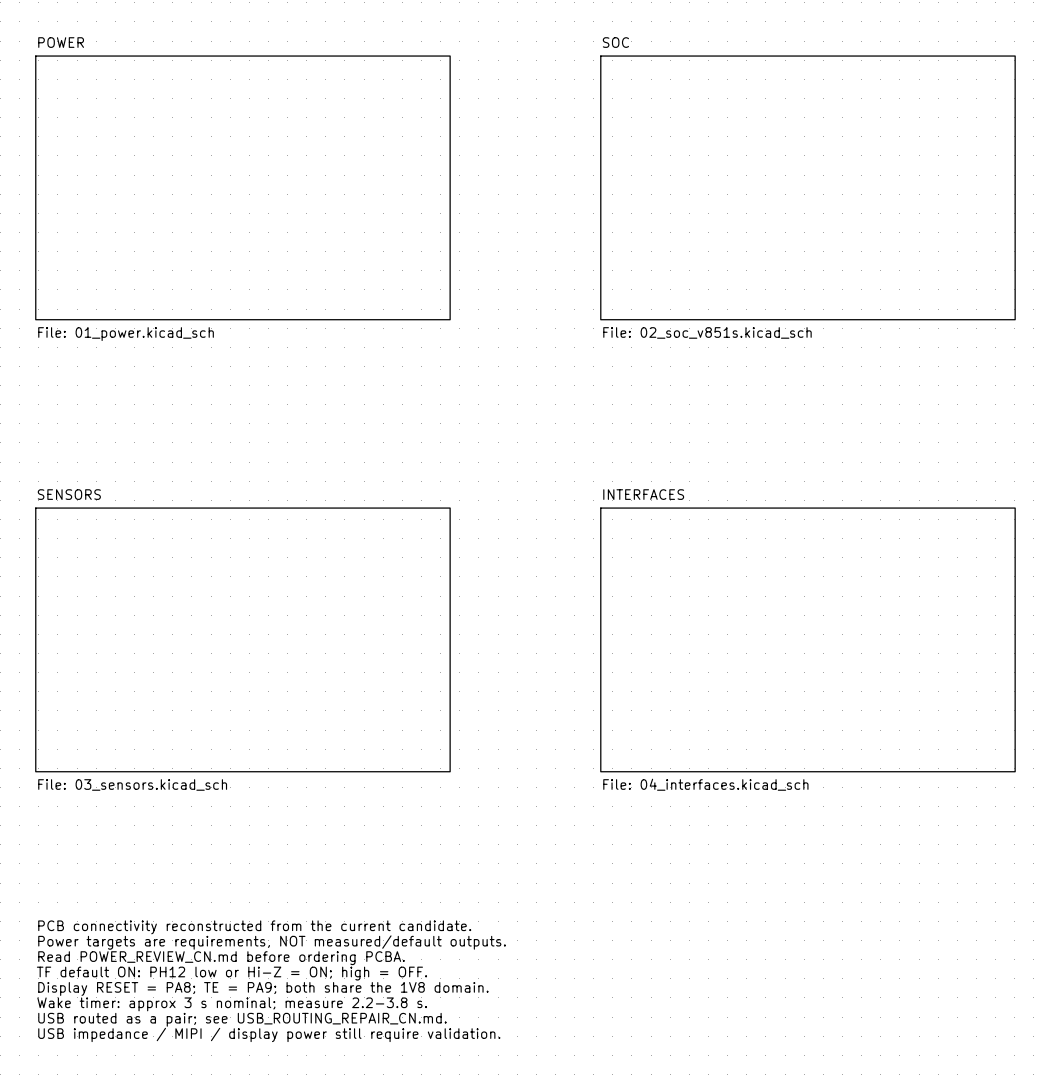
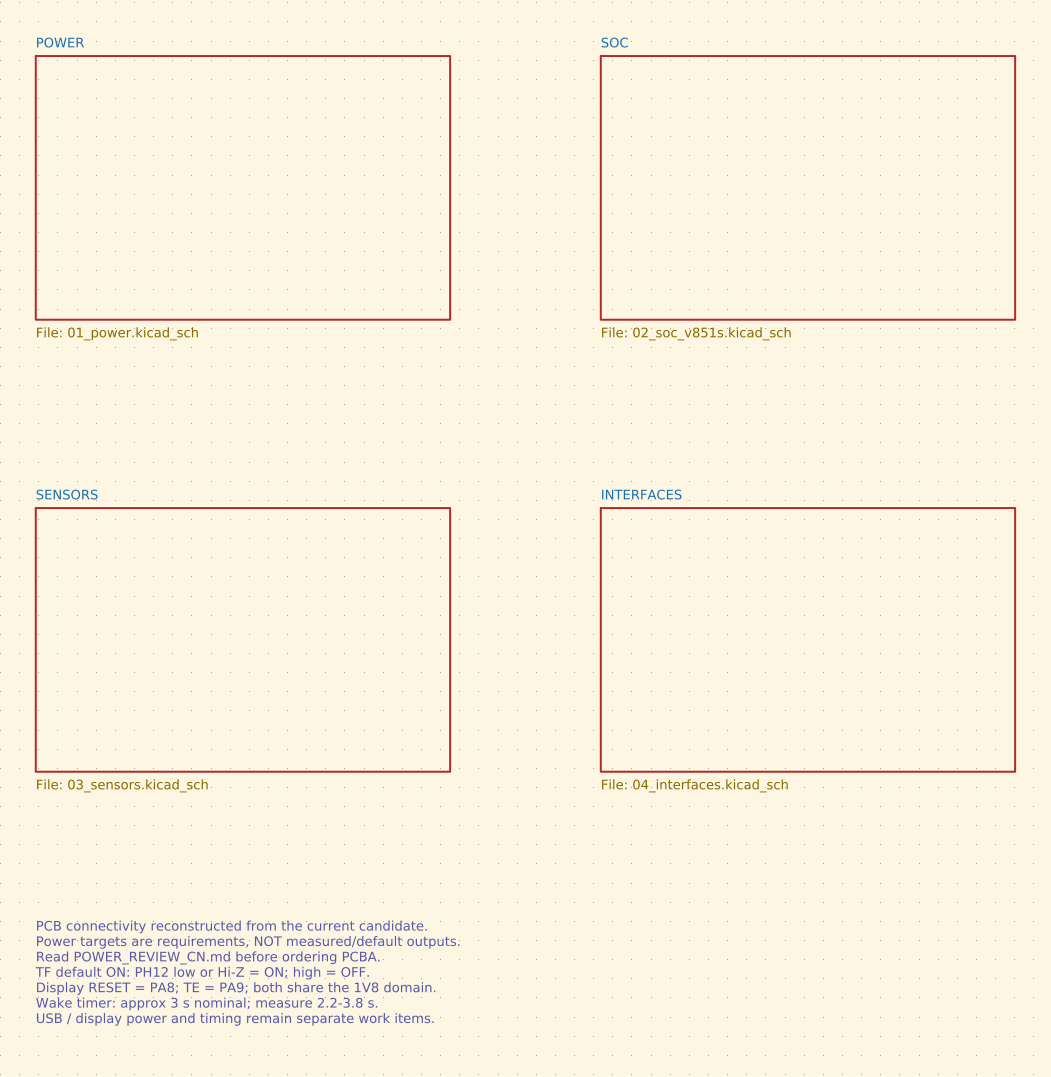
text: USB routed as a pair; see USB_ROUTING_REPAIR_CN.md. (242, 1019) -> USB / display power and timing remain separate work items. (235, 1019)
text: USB impedance / MIPI / display power still require validation. (269, 1034) -> none

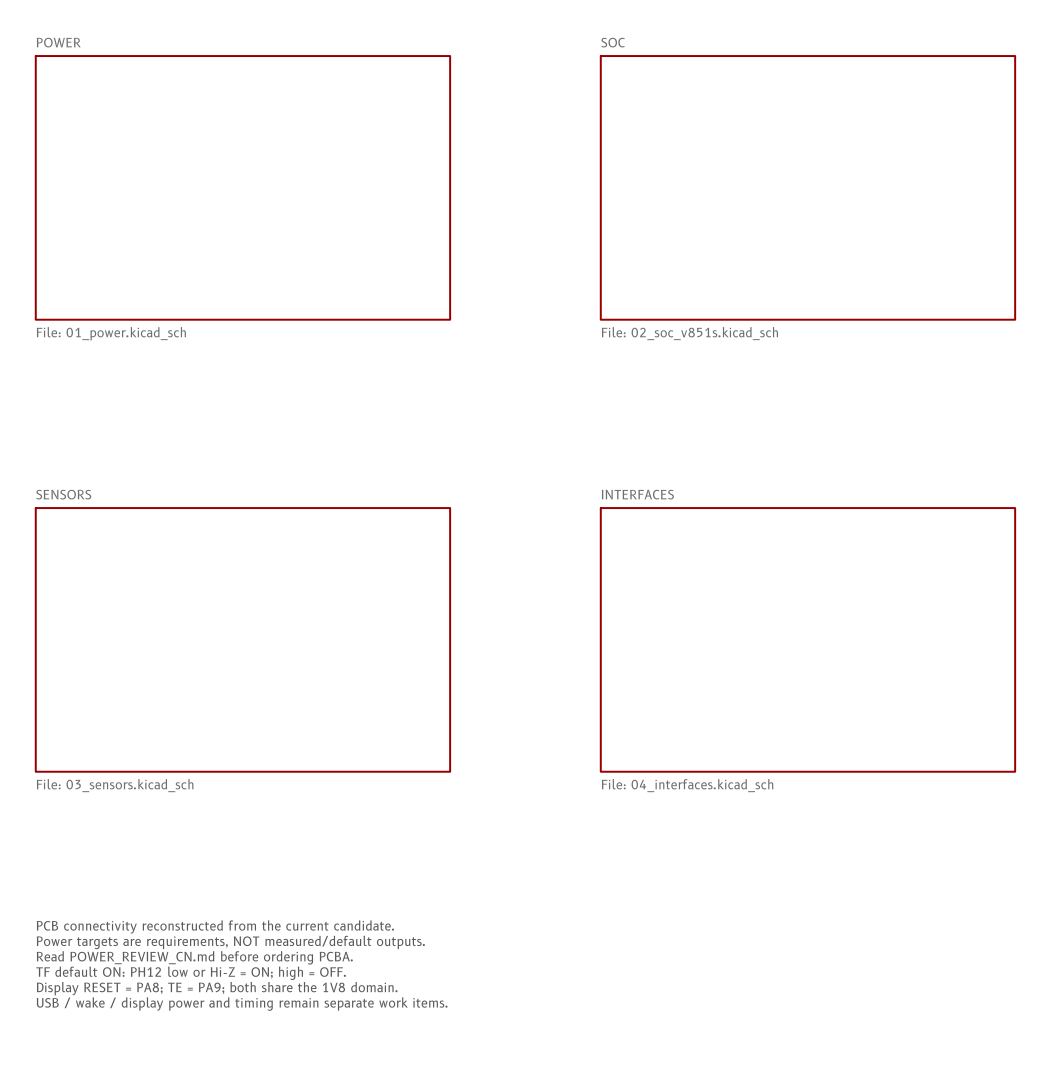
text: Wake timer: approx 3 s nominal; measure 2.2-3.8 s. (206, 1003) -> USB / wake / display power and timing remain separate work items. (242, 1004)
text: USB / display power and timing remain separate work items. (235, 1019) -> none

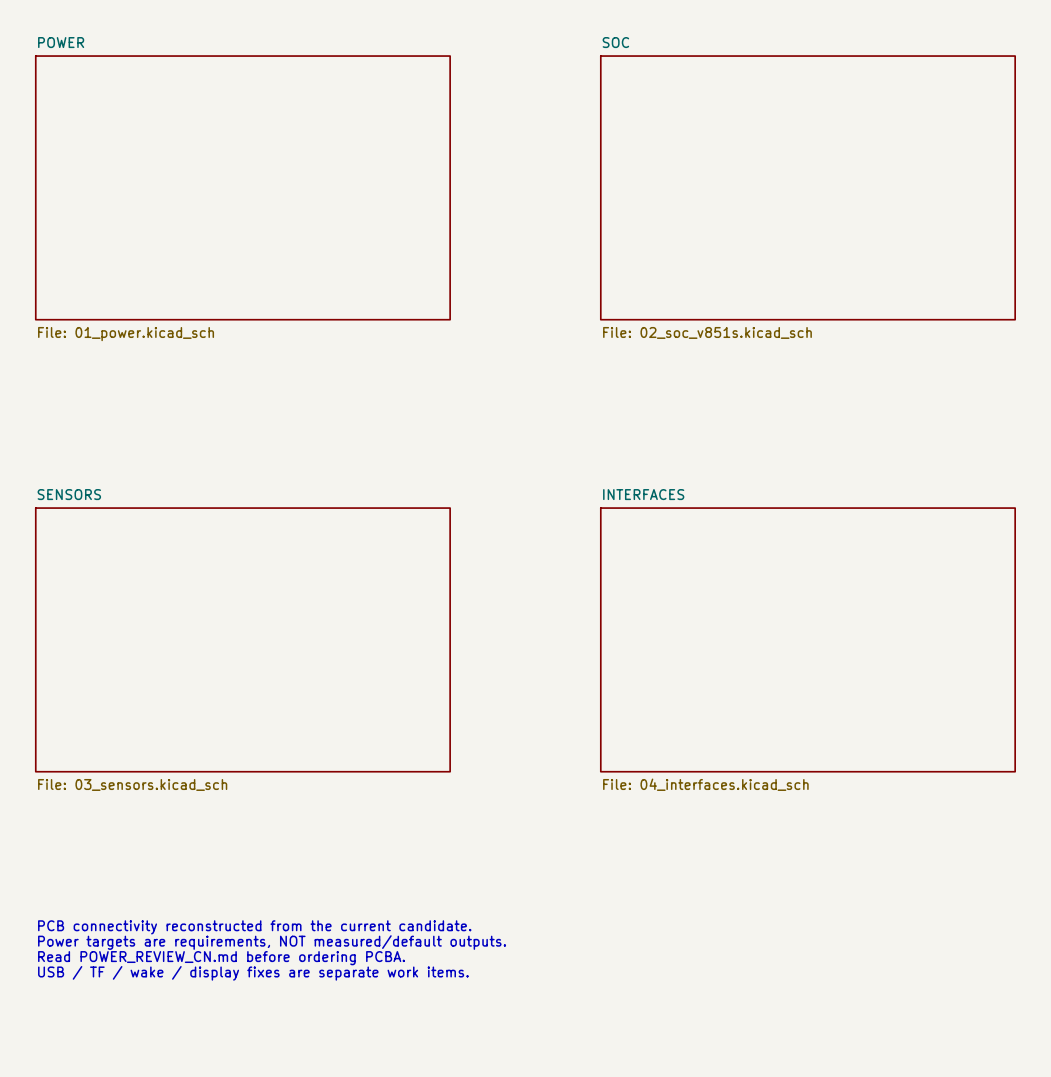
text: TF default ON: PH12 low or Hi-Z = ON; high = OFF. (191, 973) -> USB / TF / wake / display fixes are separate work items. (253, 973)
text: Display RESET = PA8; TE = PA9; both share the 1V8 domain. (217, 988) -> none
text: USB / wake / display power and timing remain separate work items. (242, 1004) -> none

